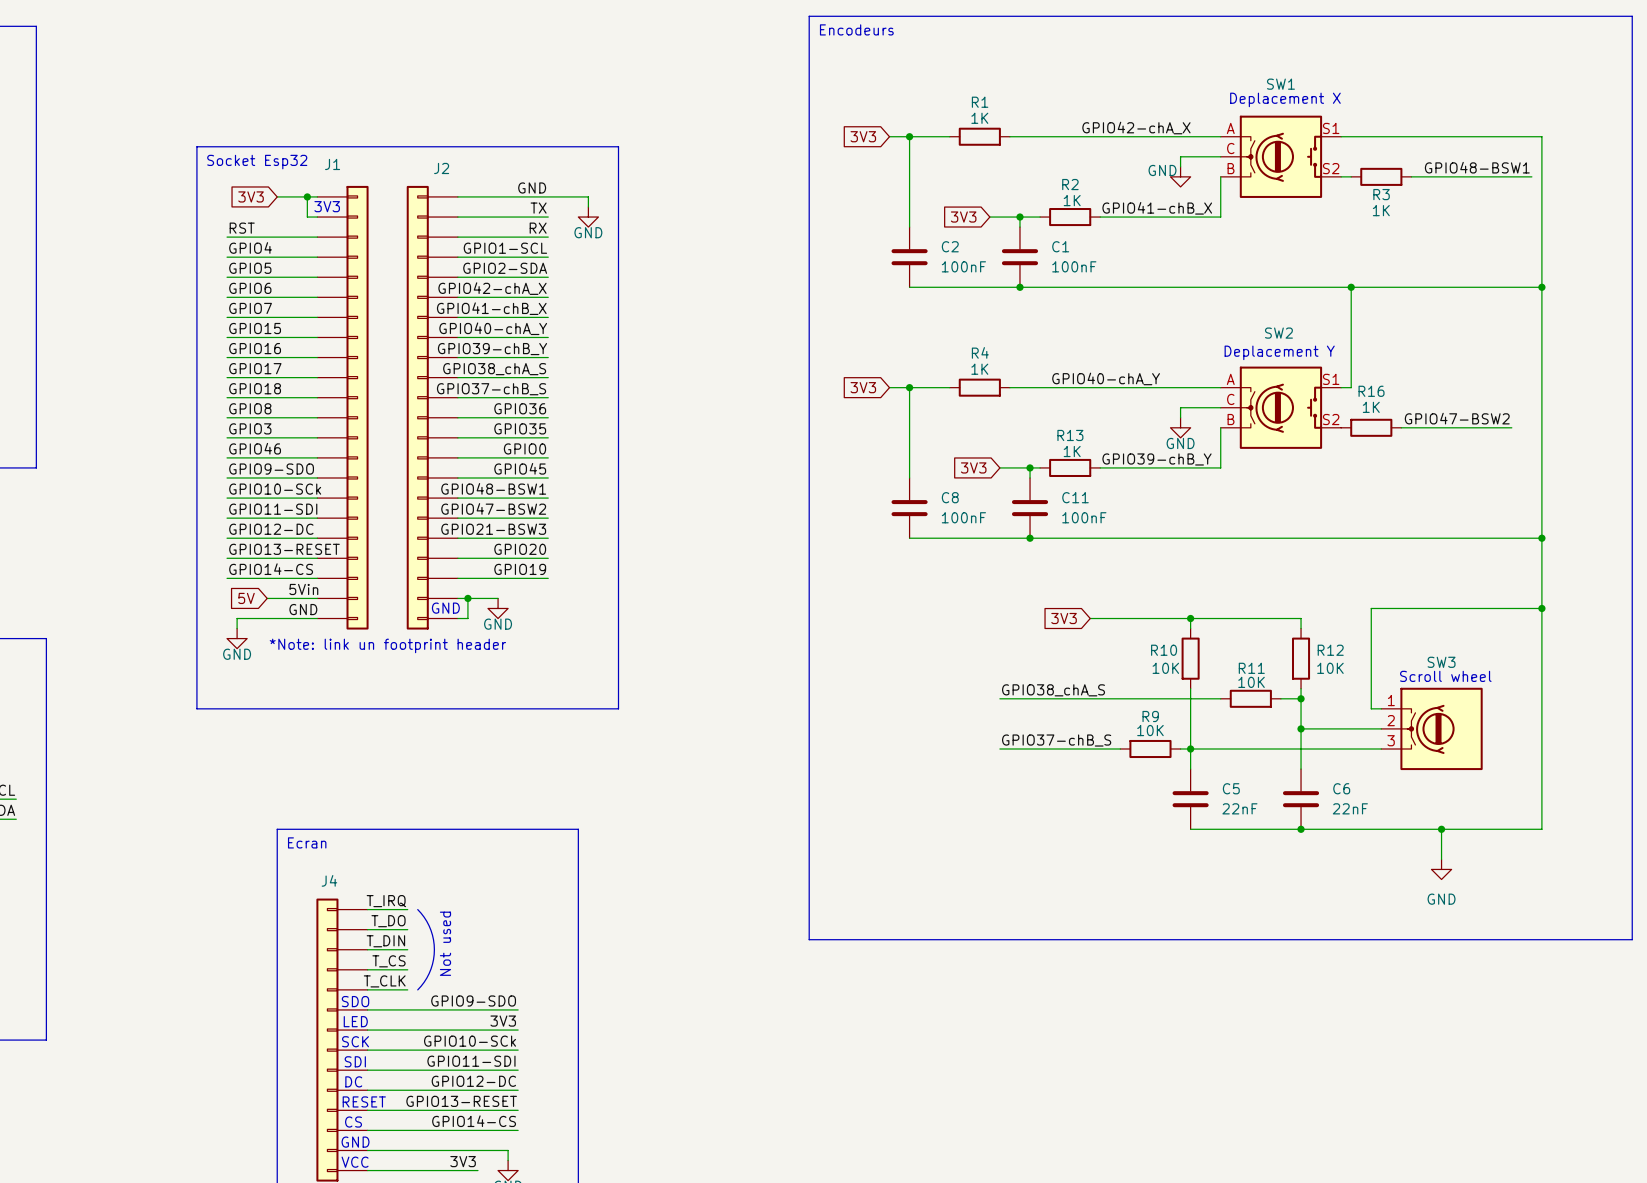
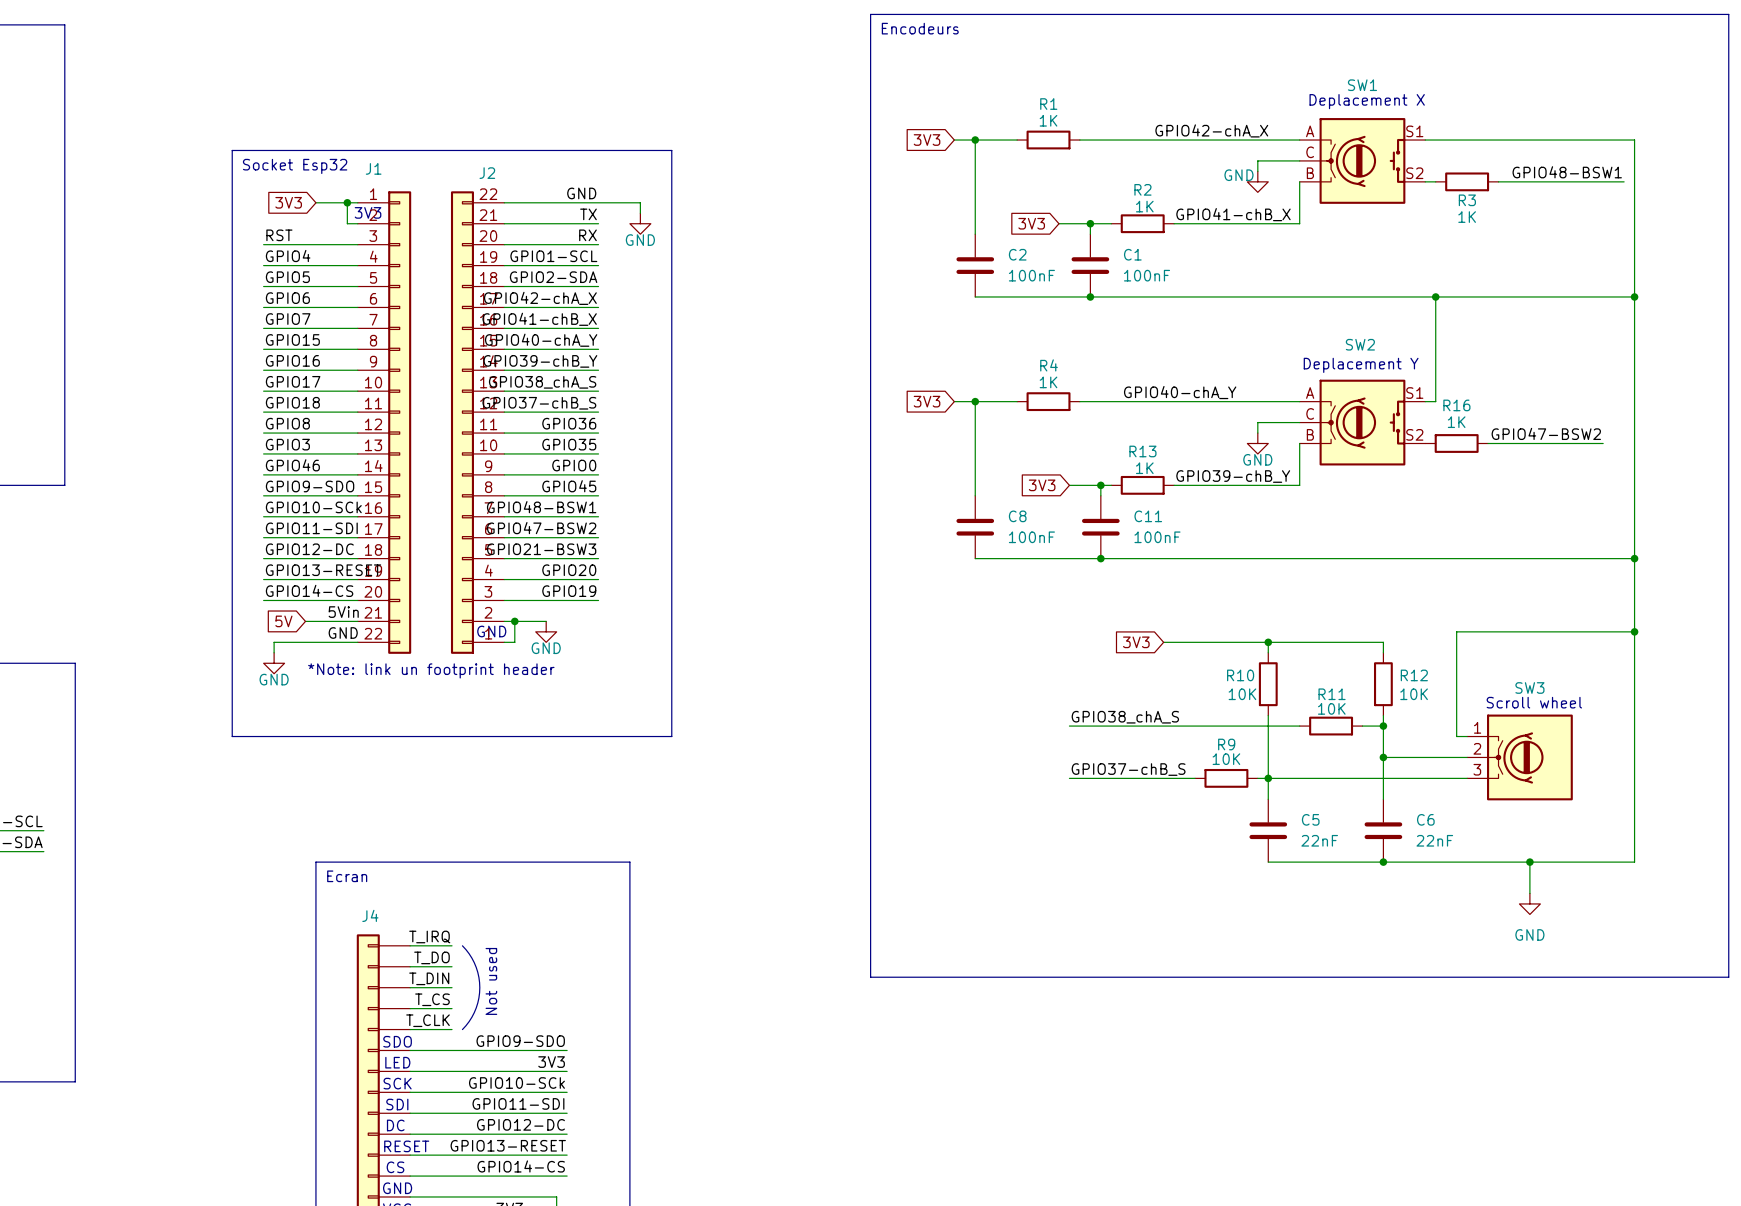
J1 symbol: [317, 185, 369, 630] -> [357, 191, 412, 654]
J2 symbol: [406, 185, 458, 630] -> [450, 191, 505, 654]

